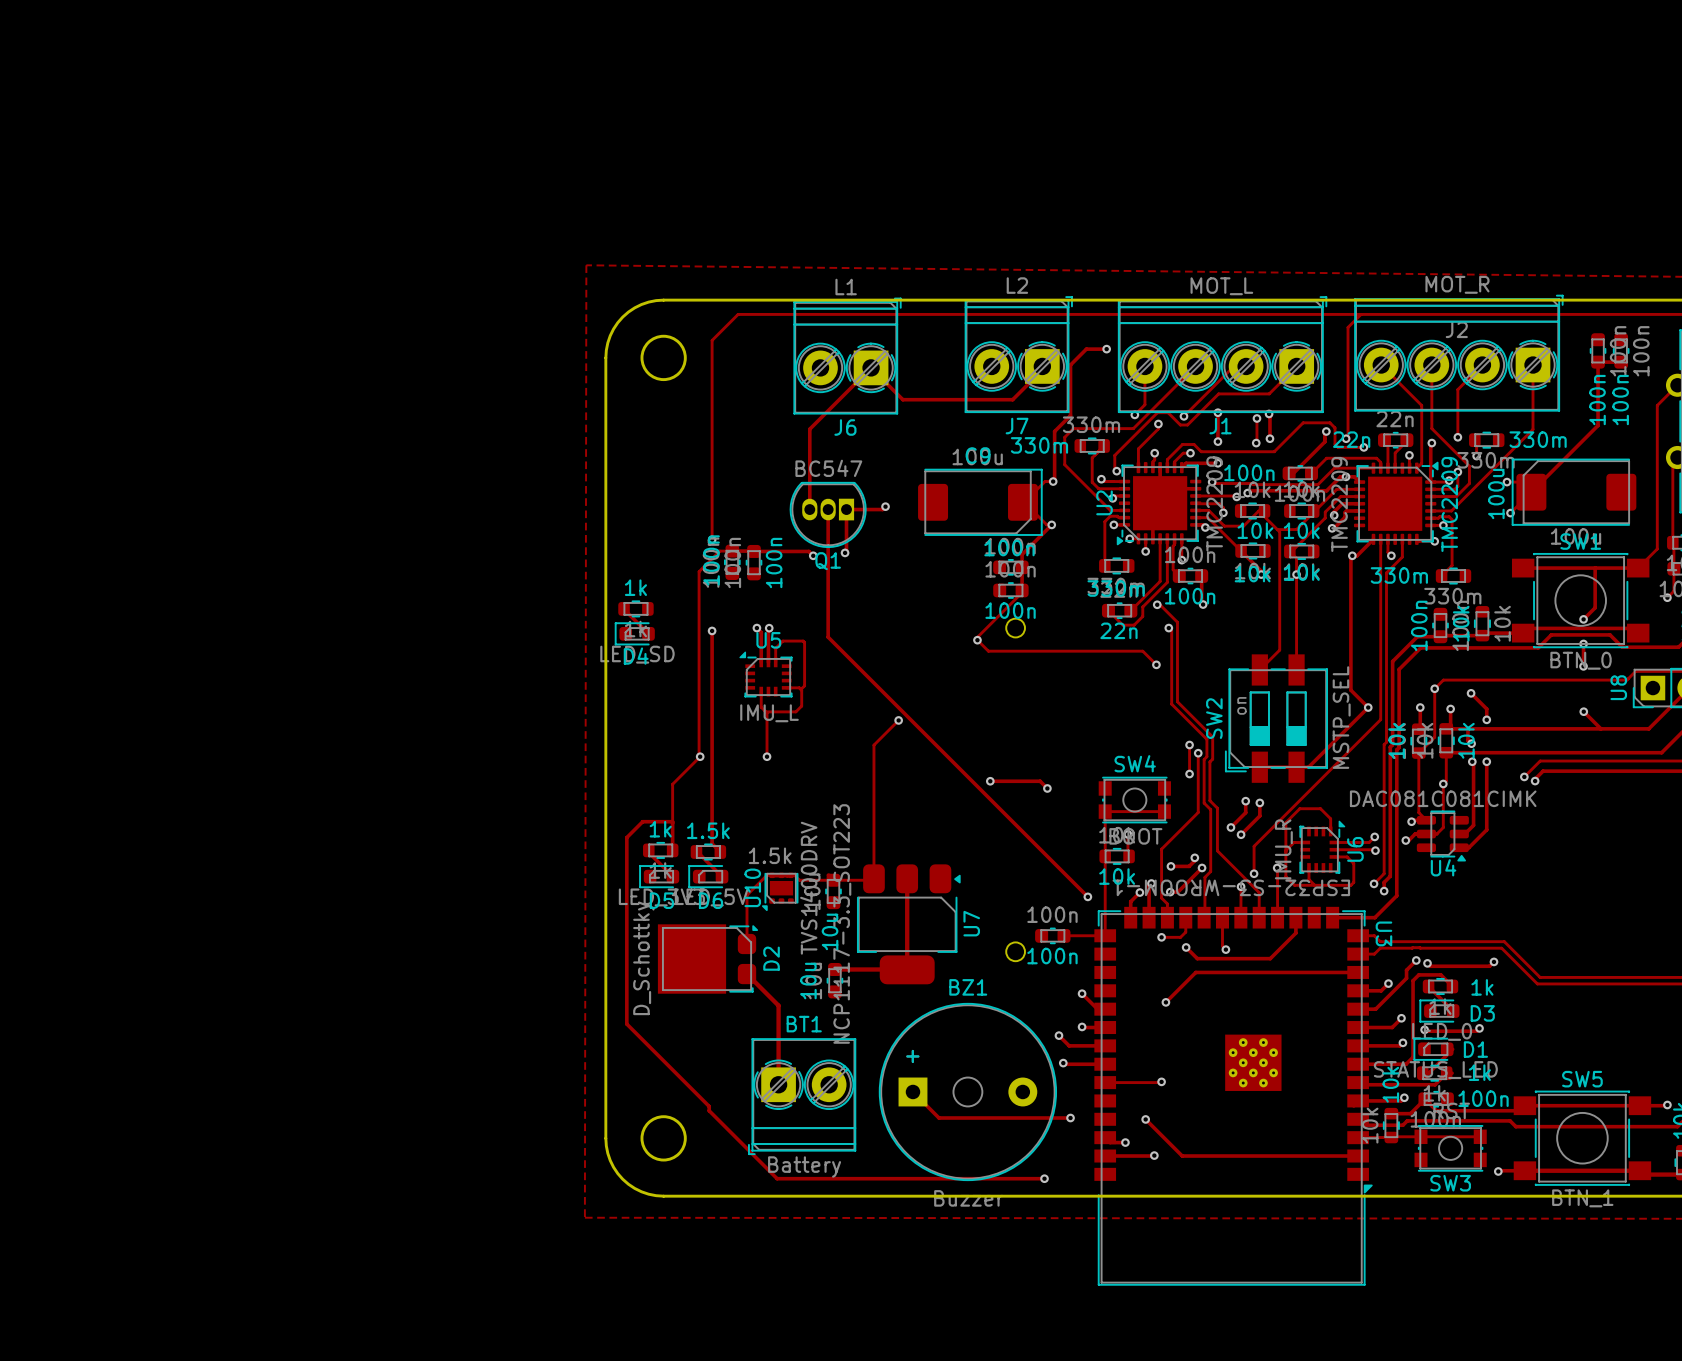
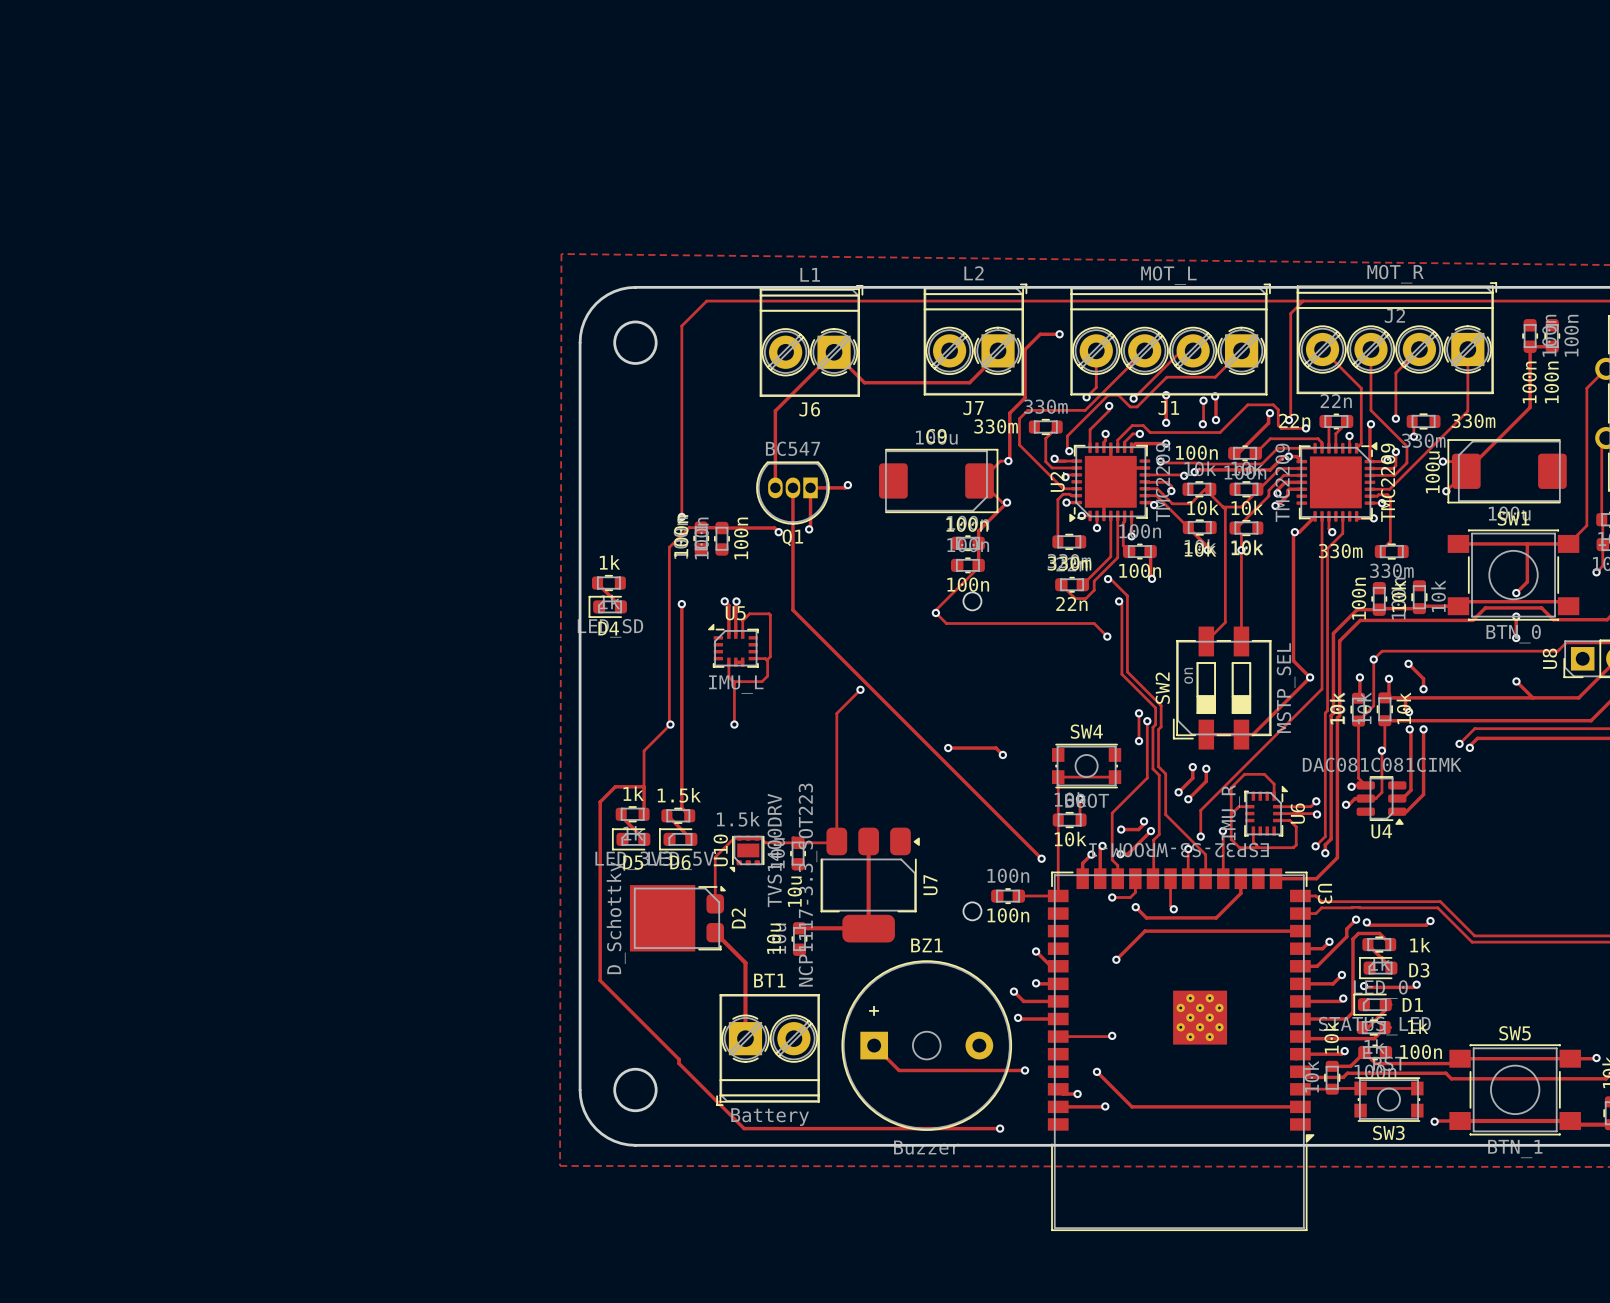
track: none -> (735, 662) (742, 662)

